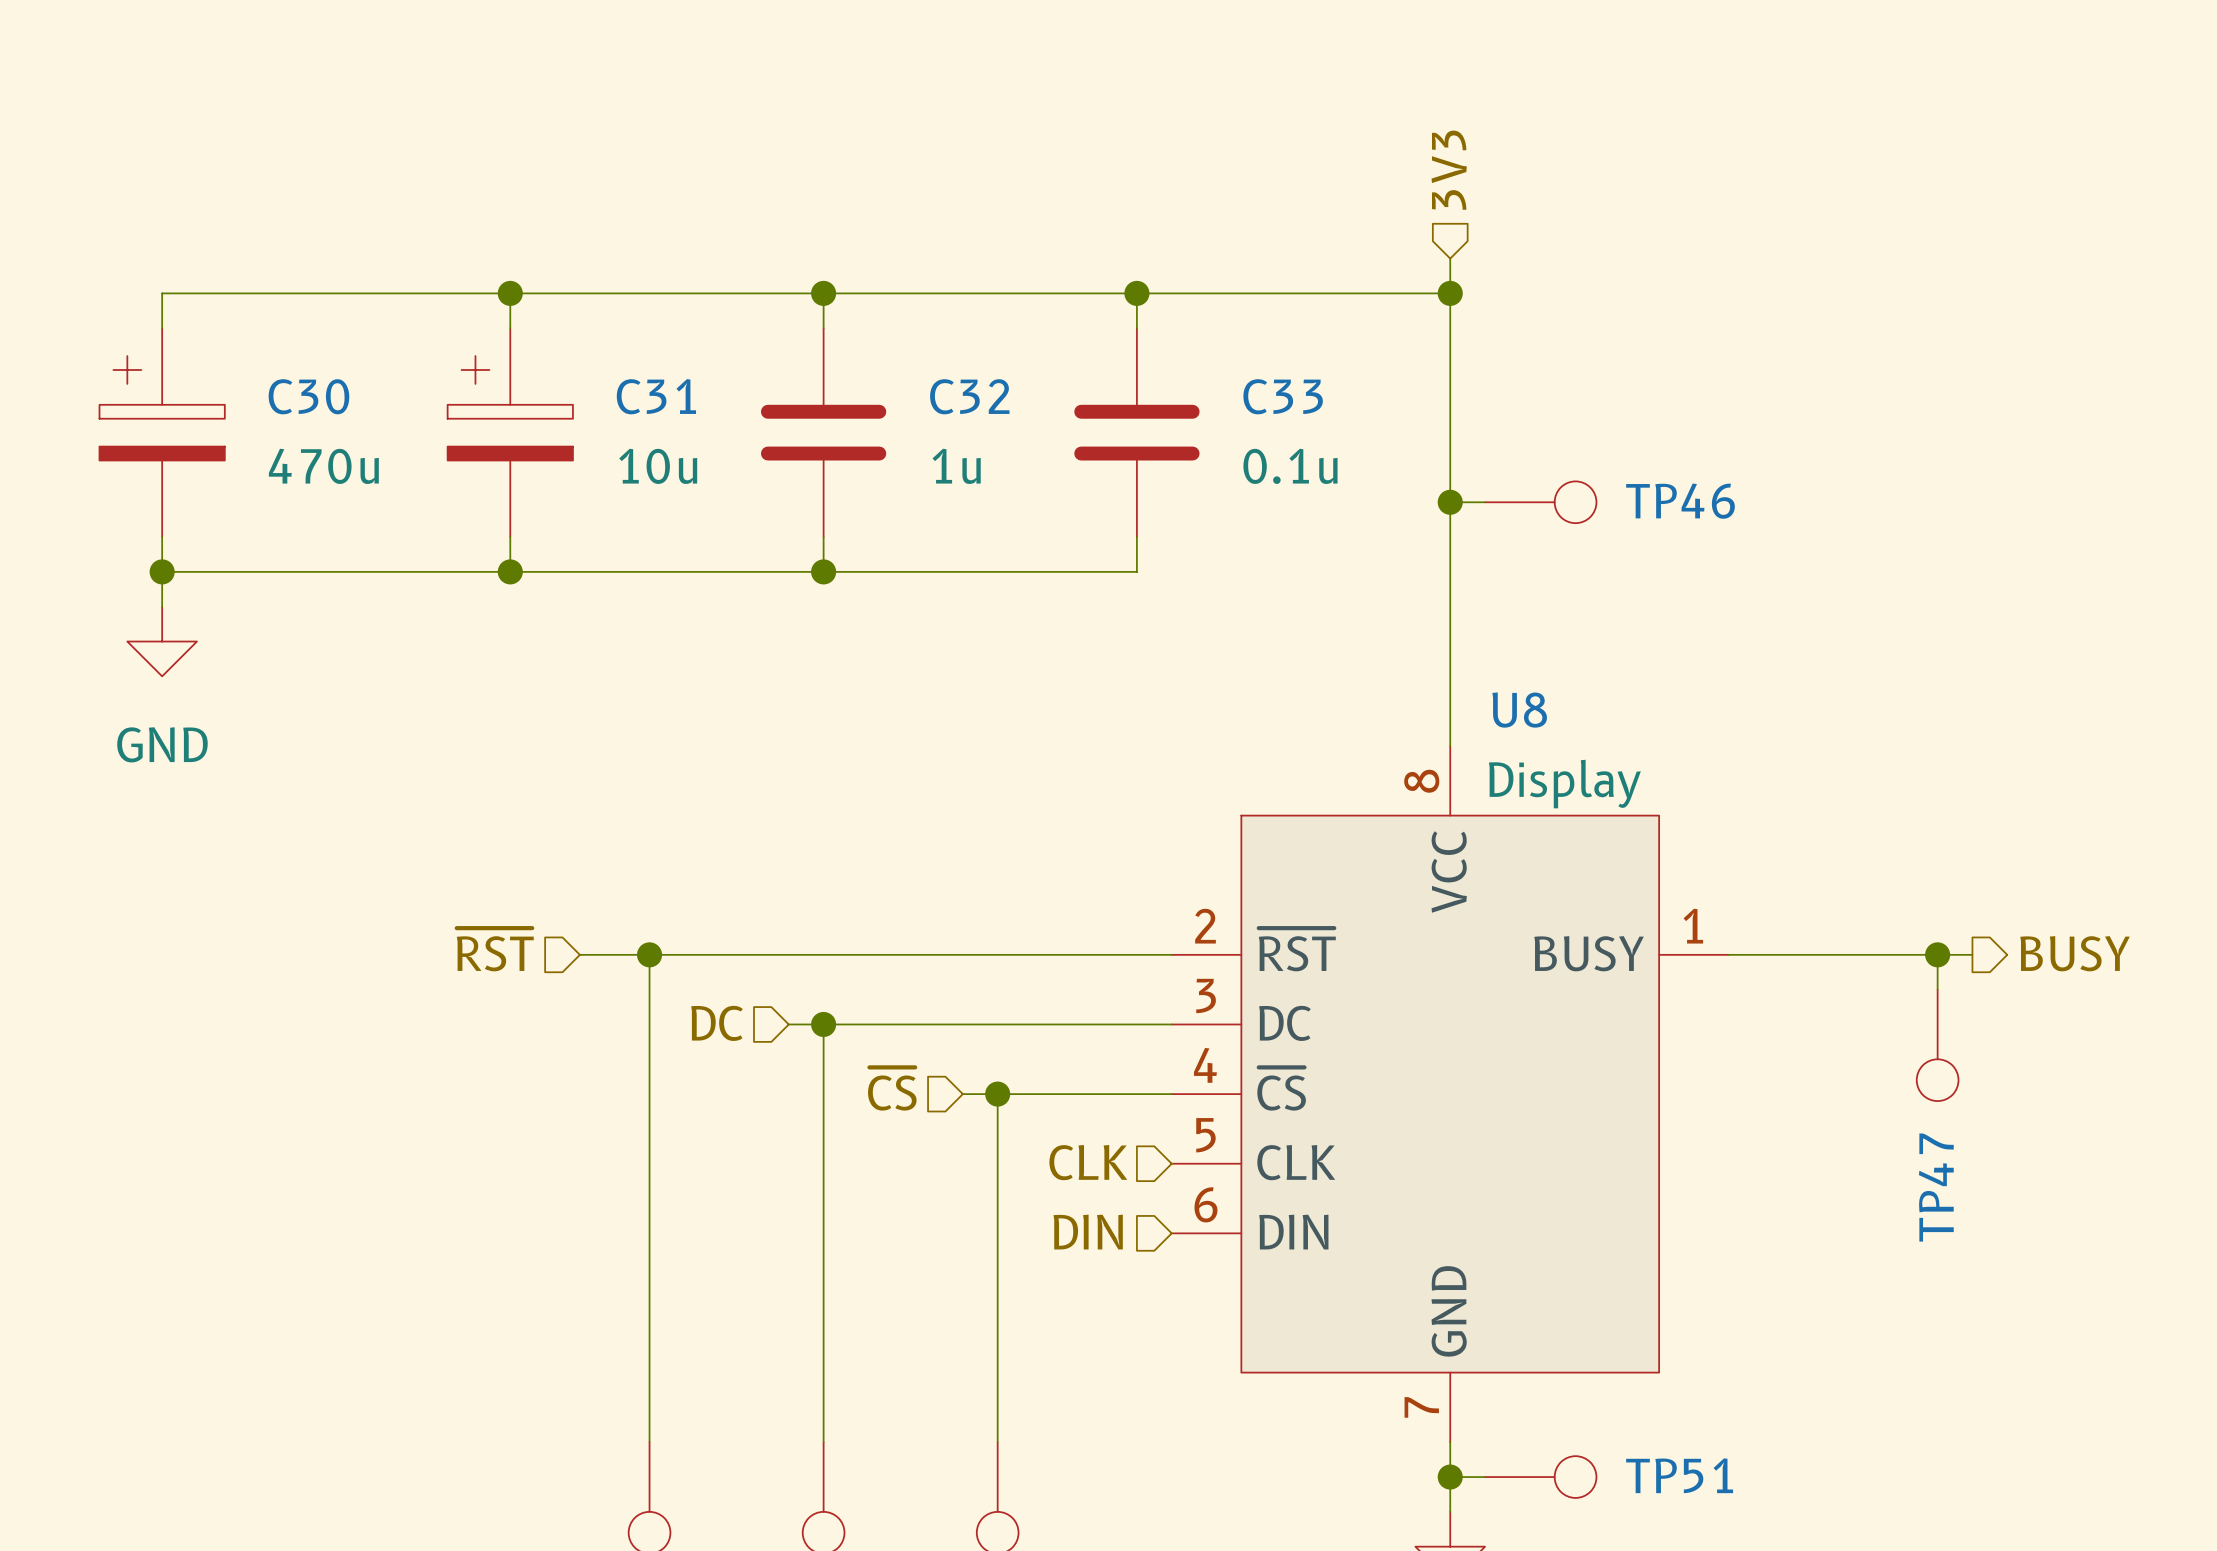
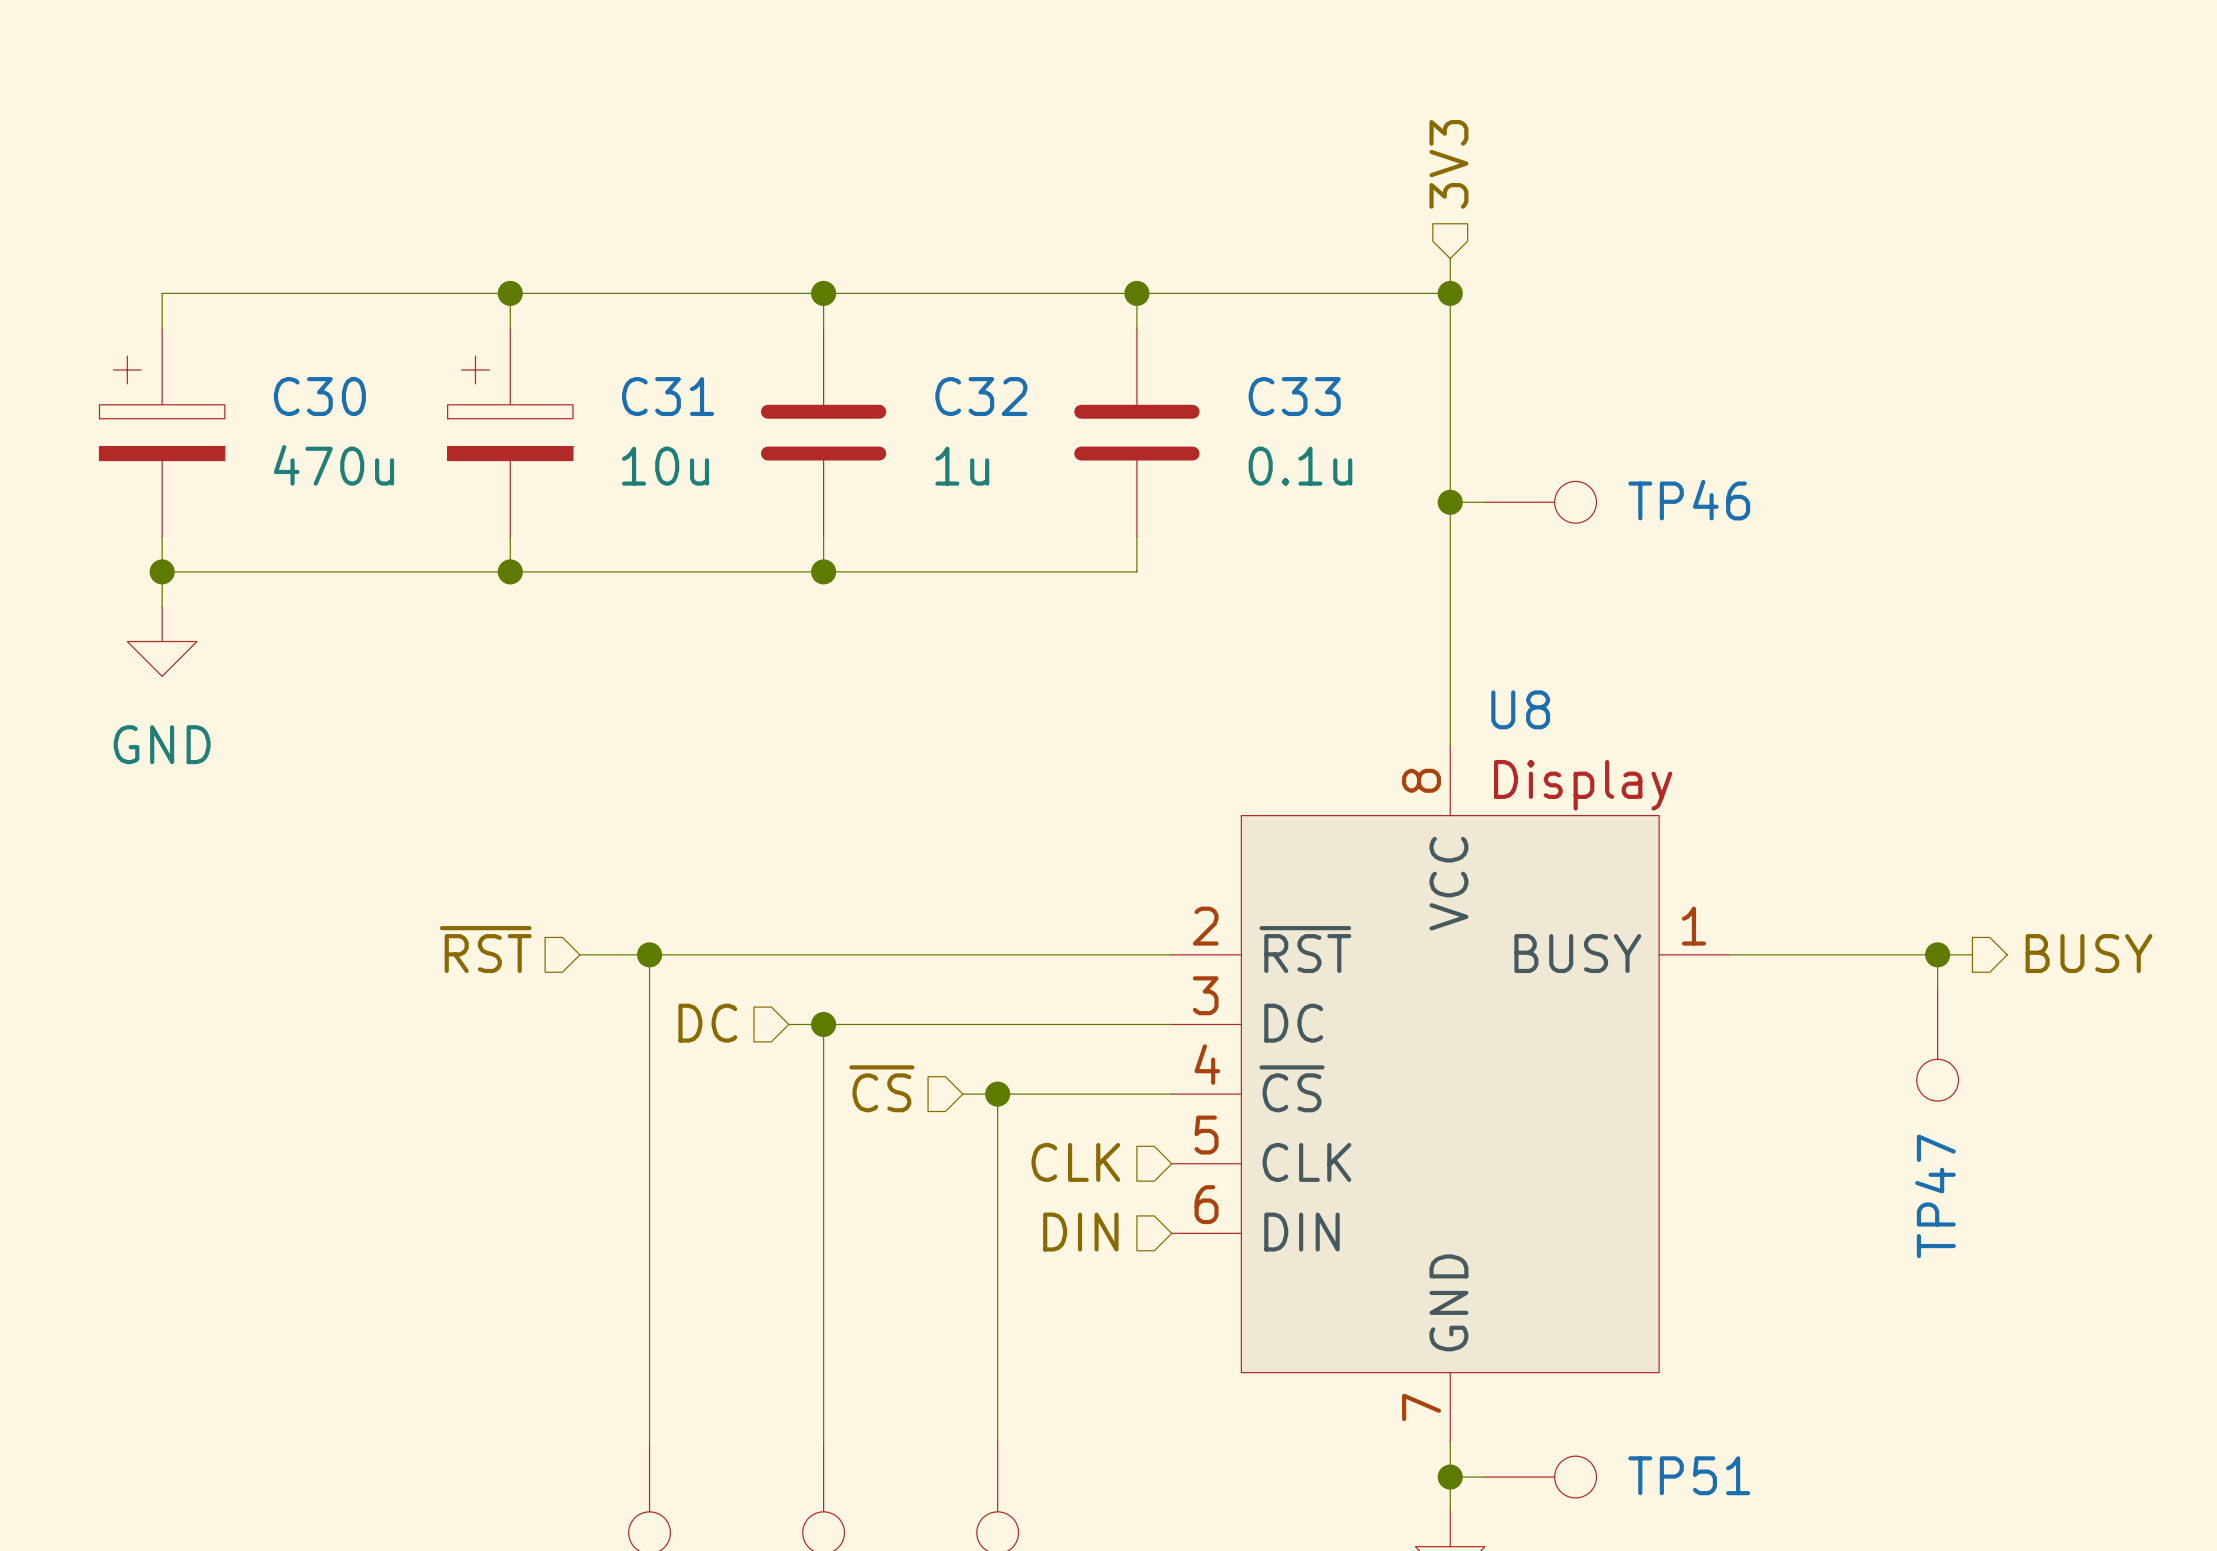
U8 text: none -> Display (1583, 785)
U8 value: Display (1564, 784) -> none

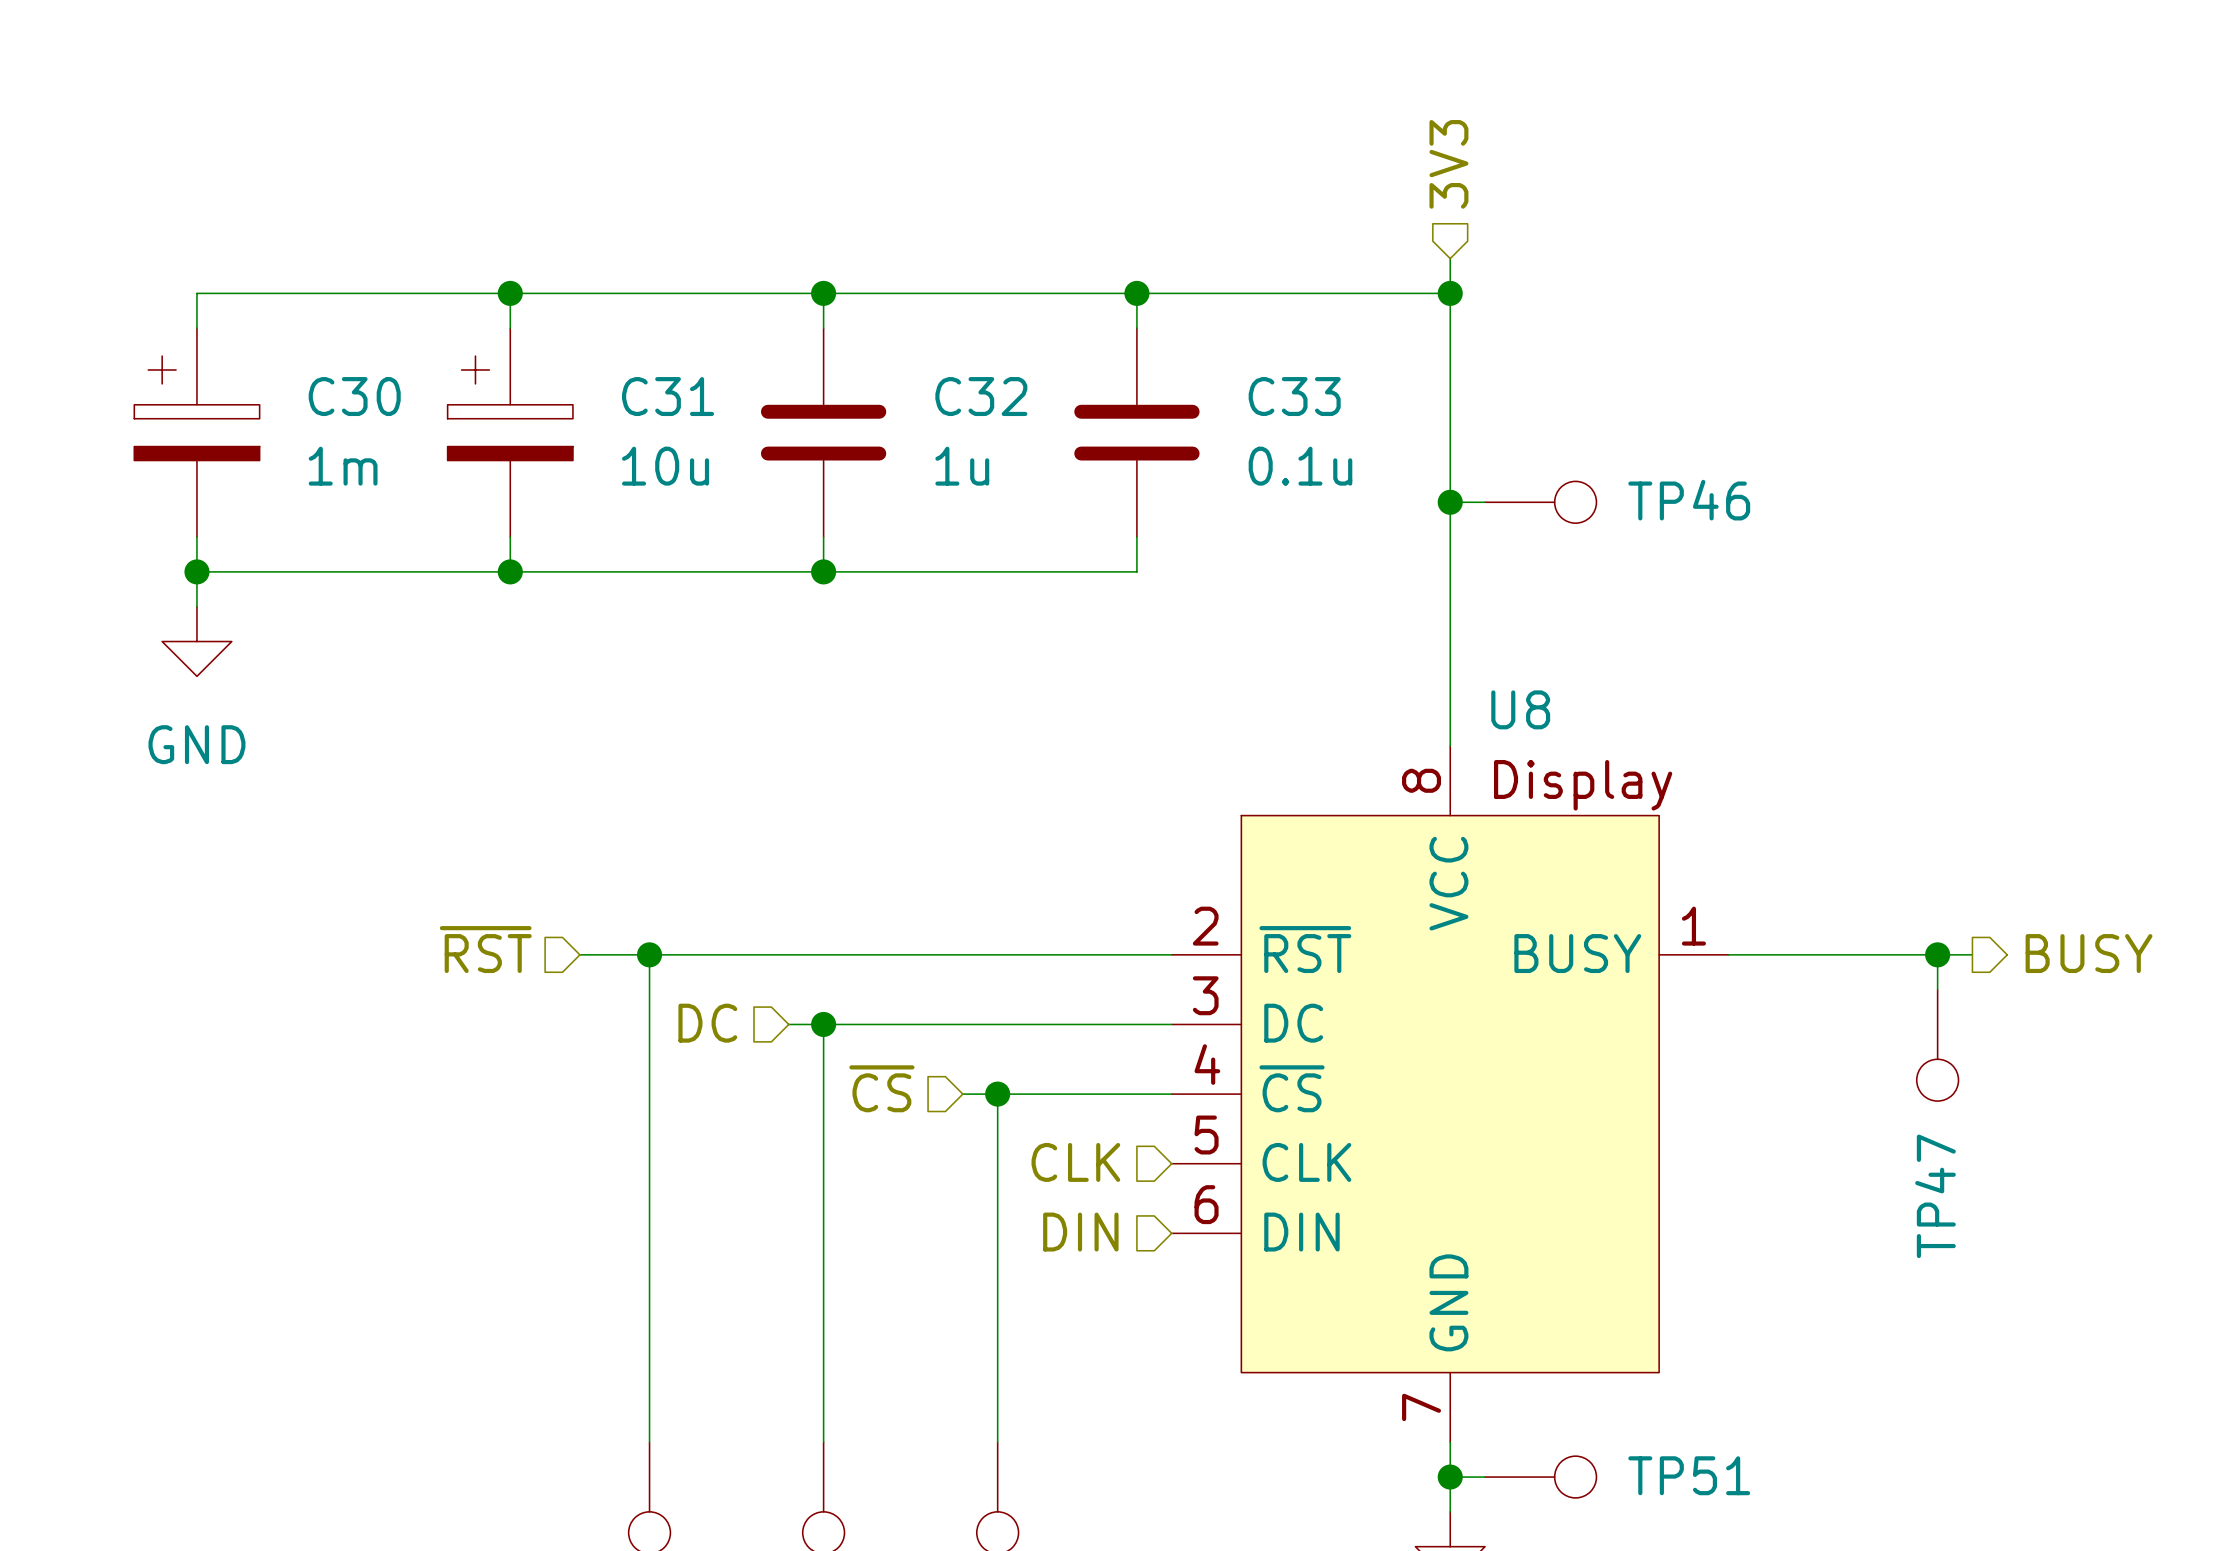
wire: (196, 293) (162, 293) (162, 328) -> (196, 293) (196, 328)
C30 position: (162, 432) -> (196, 432)
C30 value: 470u (333, 465) -> 1m (343, 466)
wire: (162, 537) (162, 606) -> (196, 537) (196, 606)
wire: (162, 571) (196, 571) -> none
junction position: (162, 571) -> (196, 571)
power symbol position: GND (162, 641) -> GND (196, 641)

